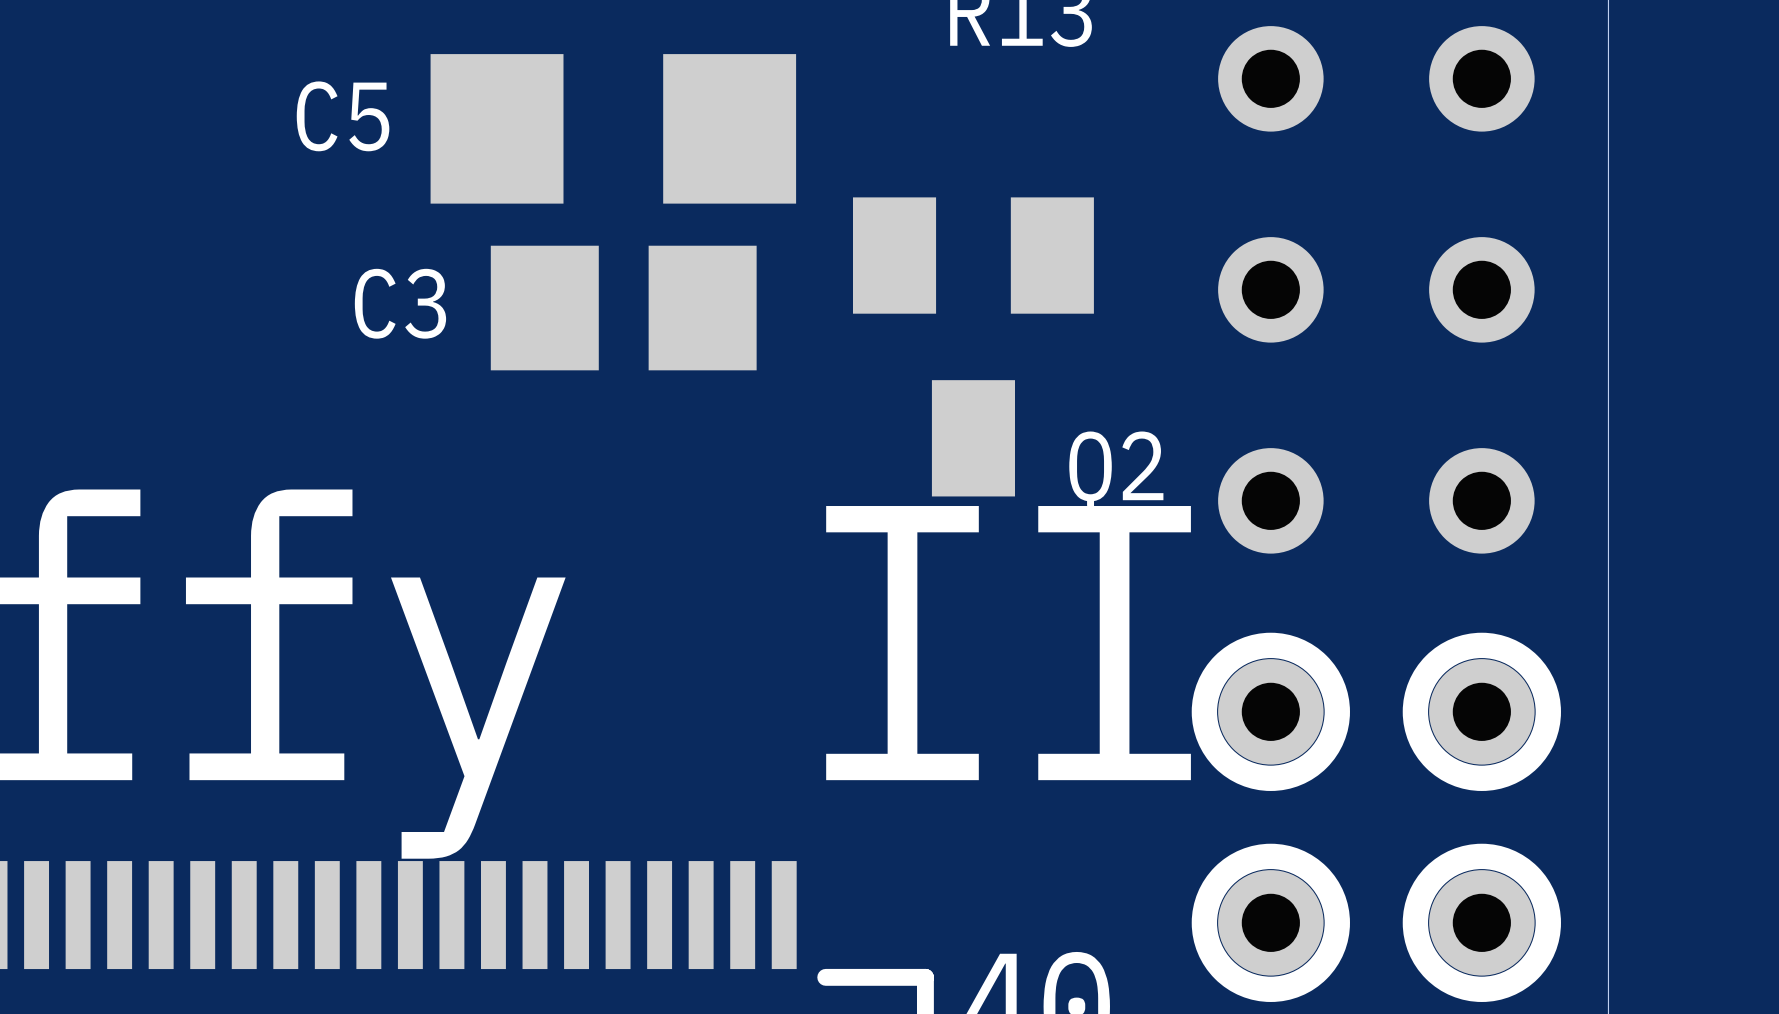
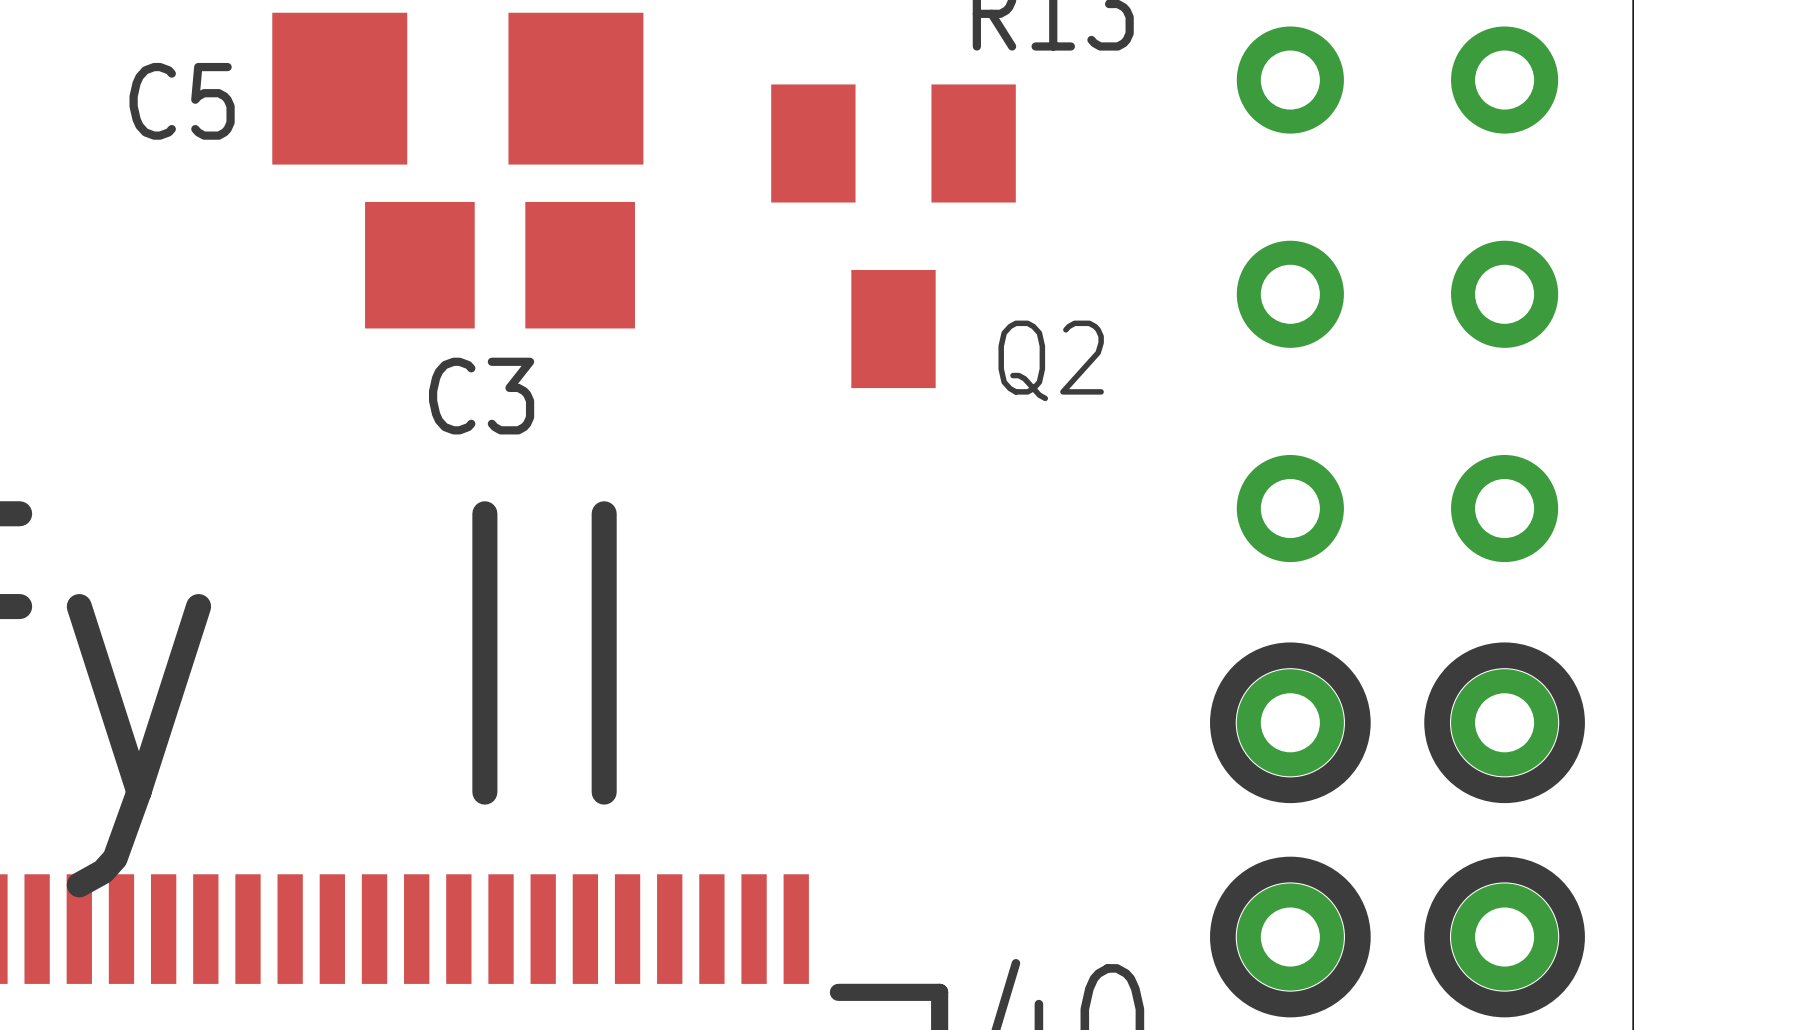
C5 name position: C5 (343, 116) -> C5 (182, 101)
C5 position: (613, 128) -> (457, 88)
C3 name position: C3 (400, 303) -> C3 (481, 396)
C3 position: (623, 308) -> (500, 265)
Q2 position: (973, 346) -> (893, 236)

